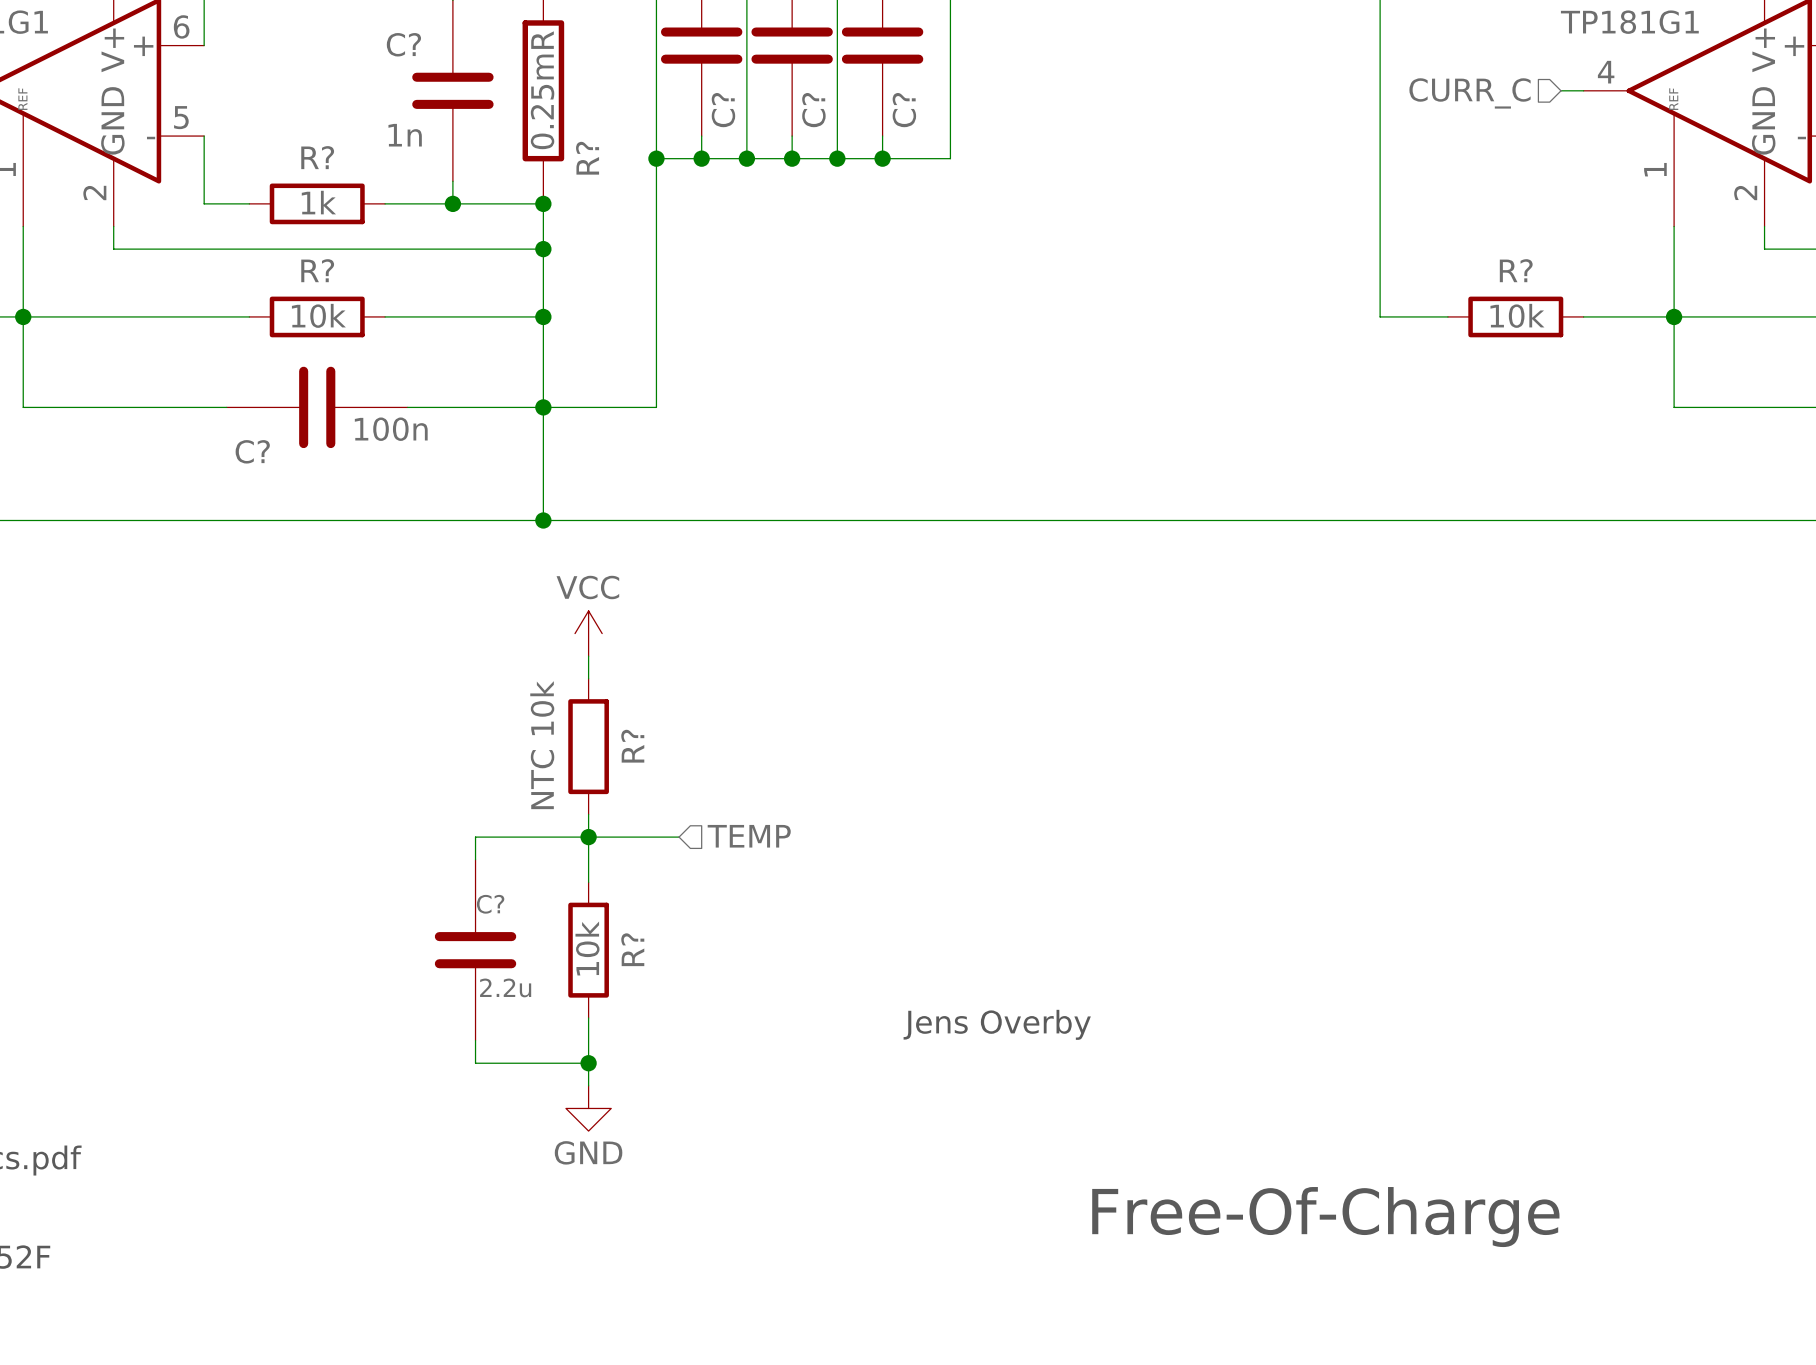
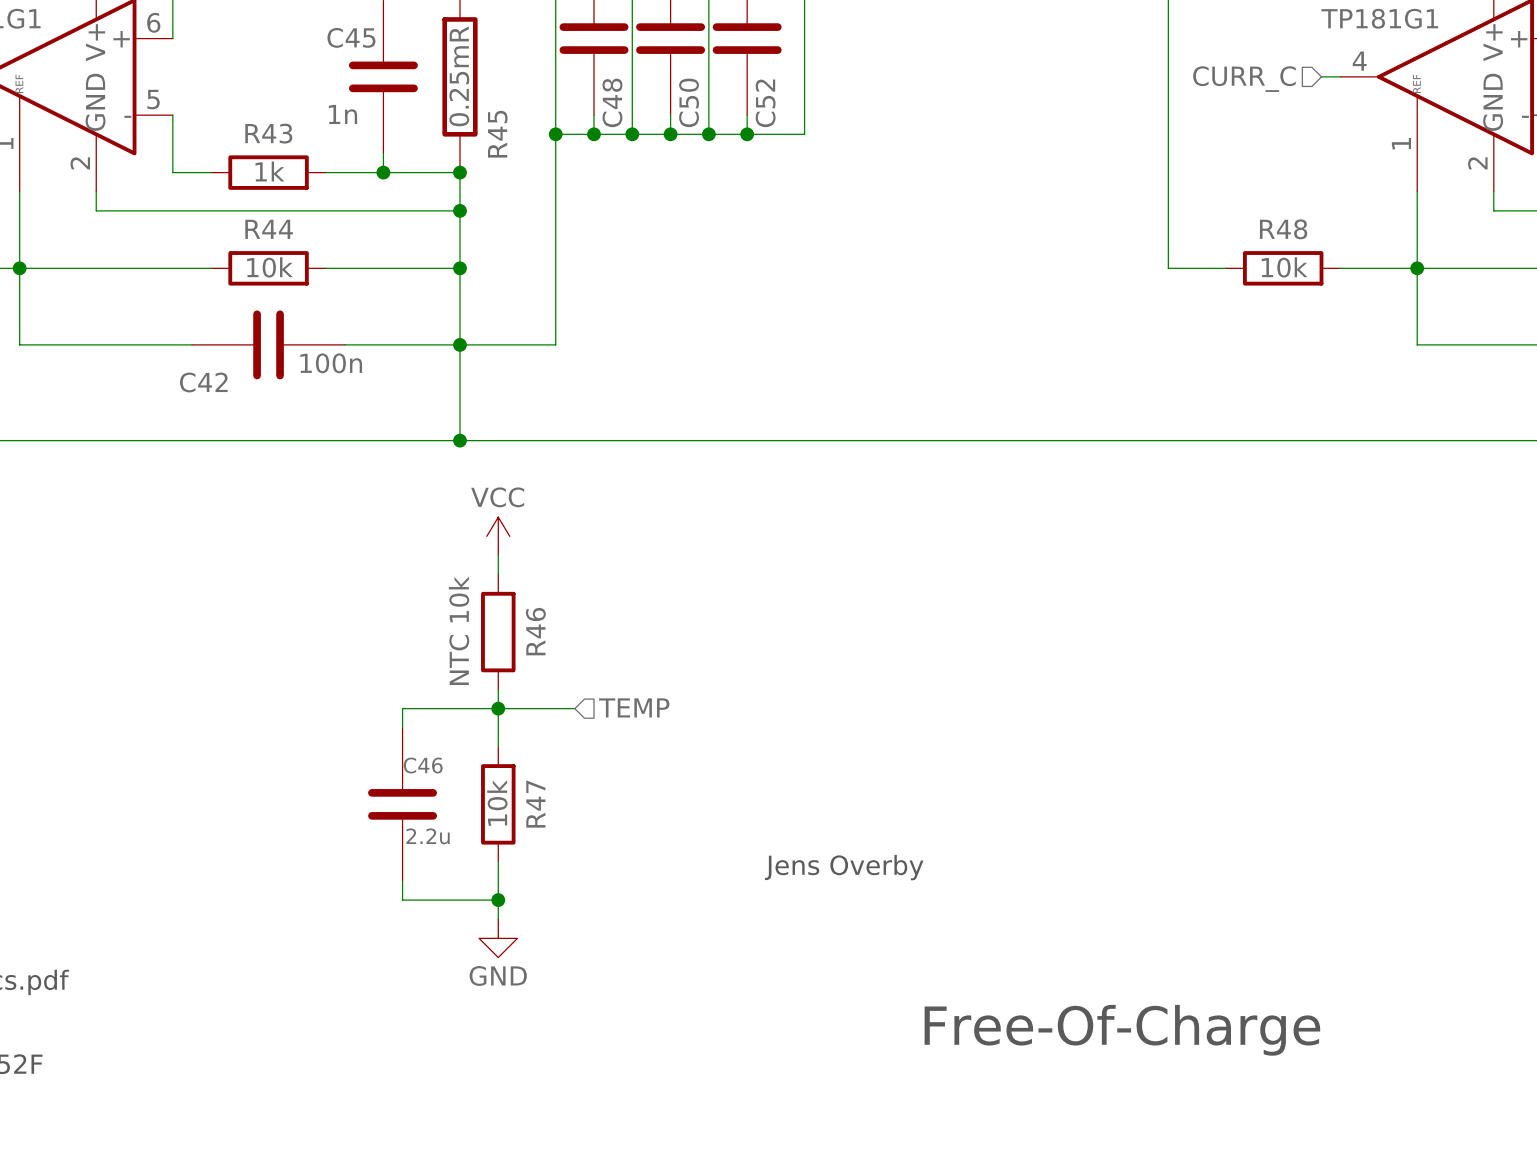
C? name: C? (403, 44) -> C45 (351, 37)
C? name: C? (723, 110) -> C48 (612, 102)
C? name: C? (813, 110) -> C50 (689, 102)
C? name: C? (904, 110) -> C52 (765, 103)
R? name: R? (317, 157) -> R43 (268, 133)
R? name: R? (587, 158) -> R45 (497, 134)
R? name: R? (317, 270) -> R44 (269, 229)
R? name: R? (1516, 270) -> R48 (1283, 229)
C? name: C? (252, 451) -> C42 (203, 382)
R? name: R? (632, 746) -> R46 (535, 631)
C? name: C? (490, 904) -> C46 (423, 765)
R? name: R? (632, 949) -> R47 (535, 804)

